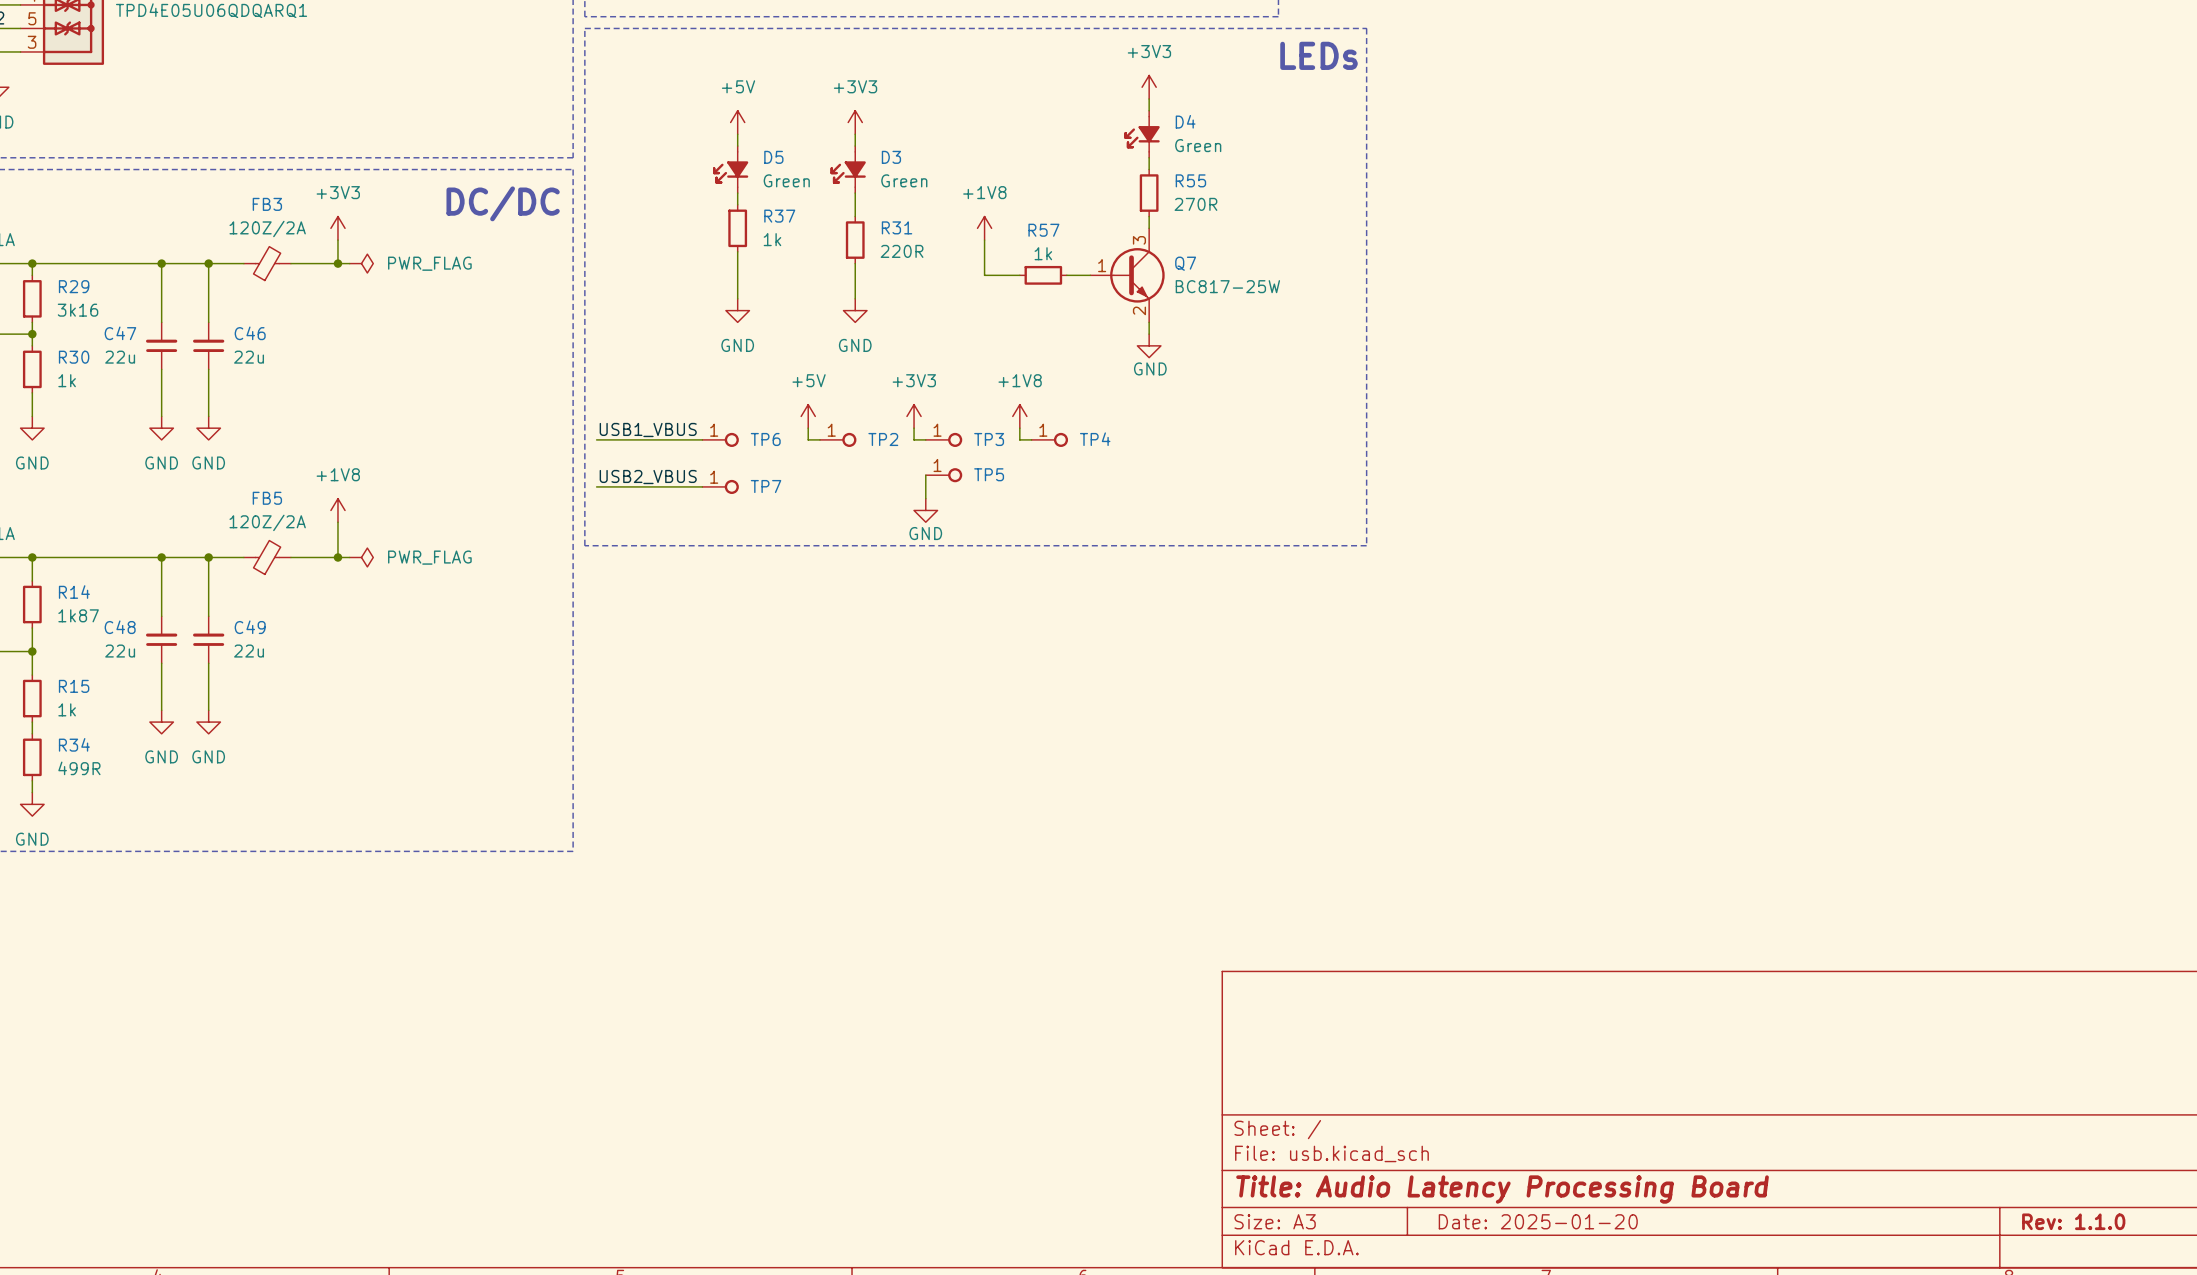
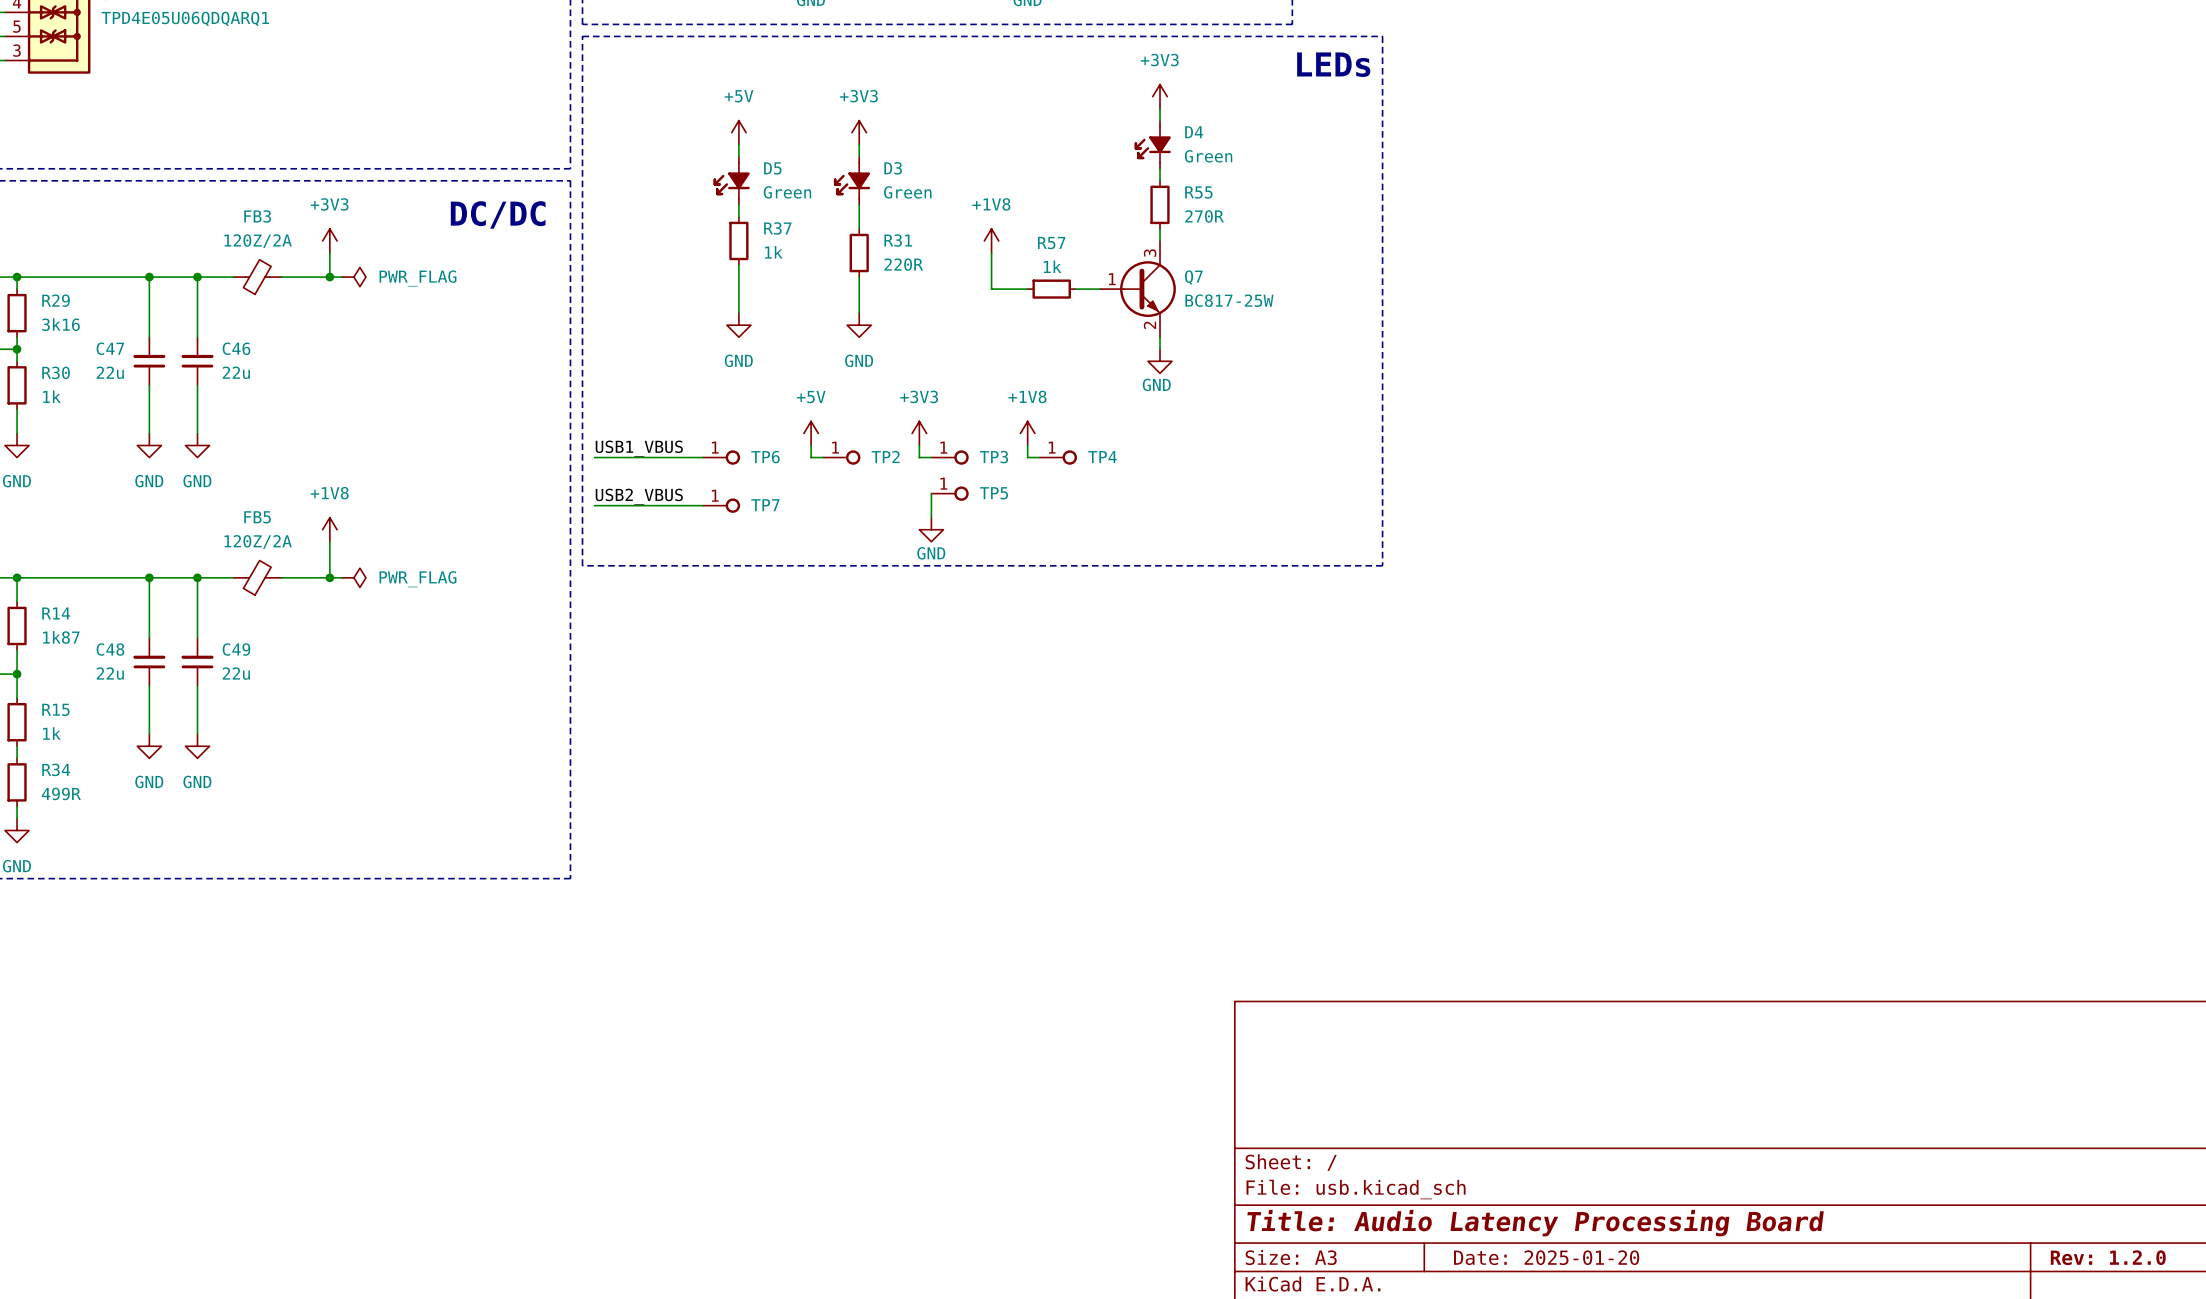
title block: Rev: 1.1.0 (2073, 1221) -> Rev: 1.2.0 (2108, 1257)

